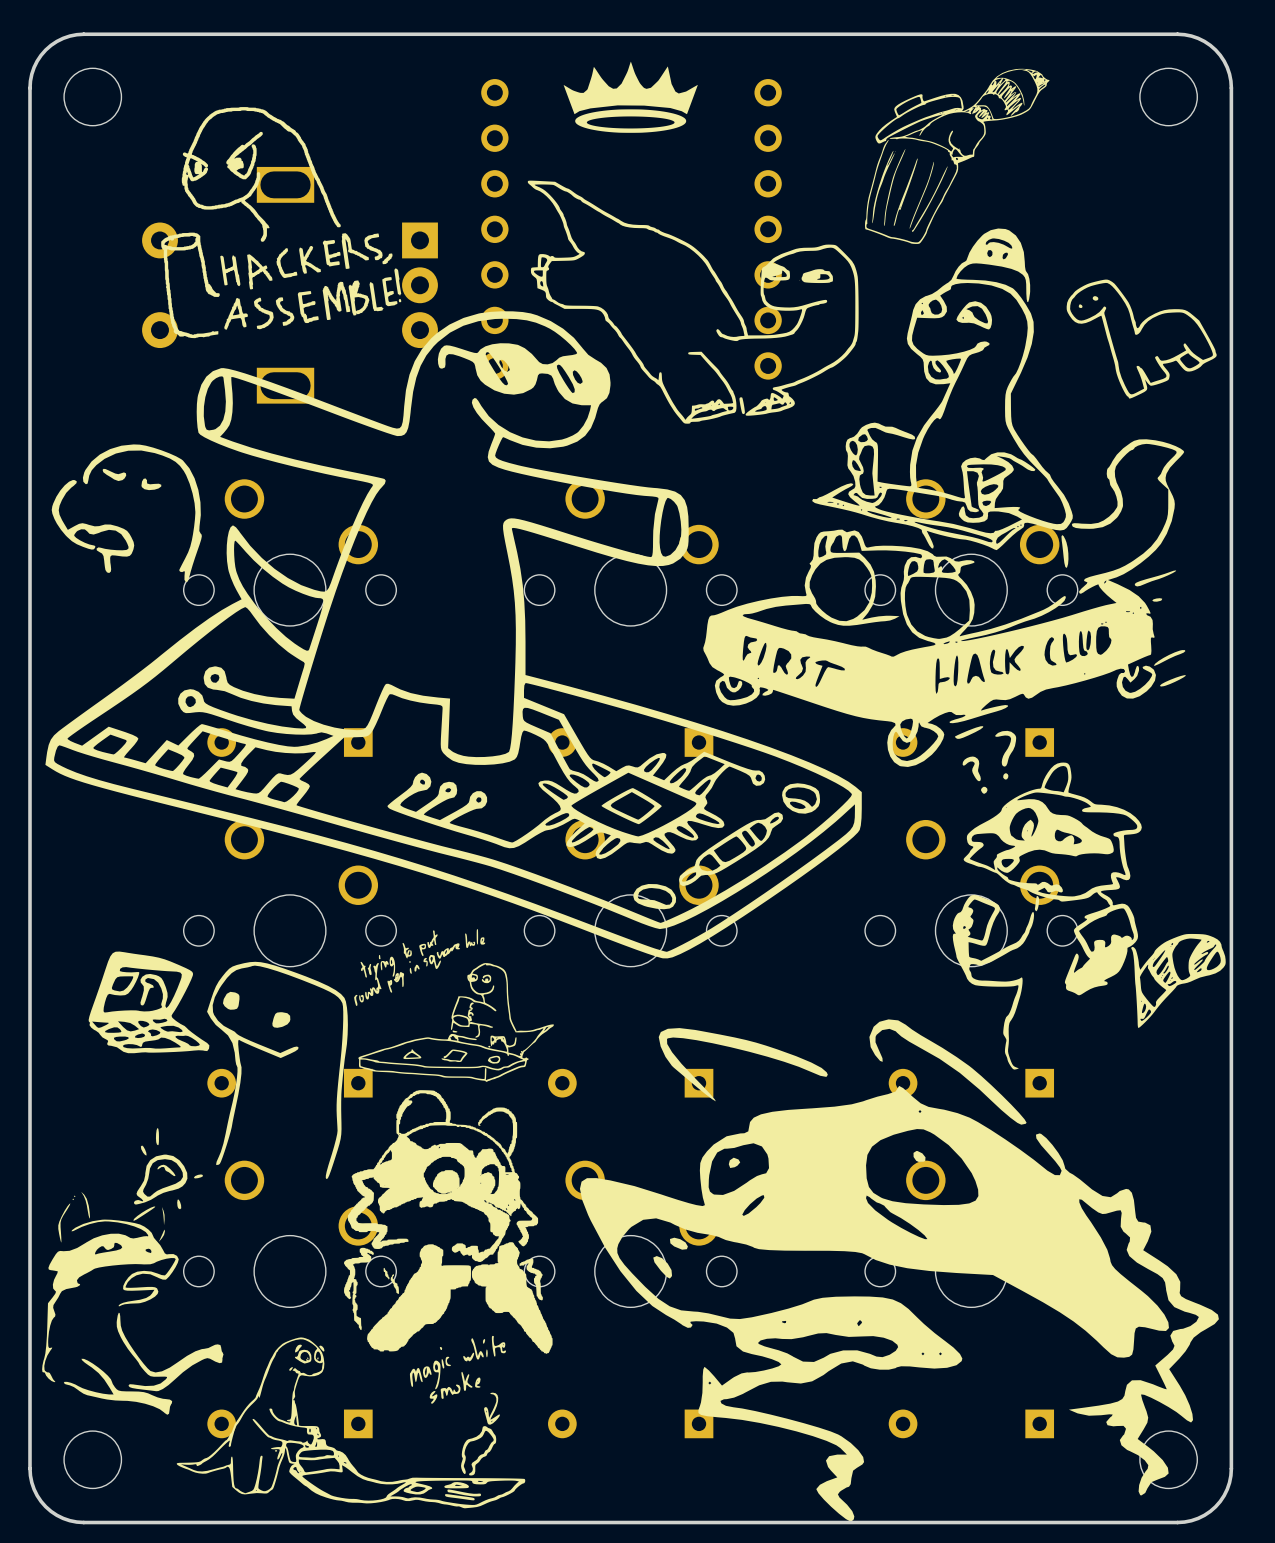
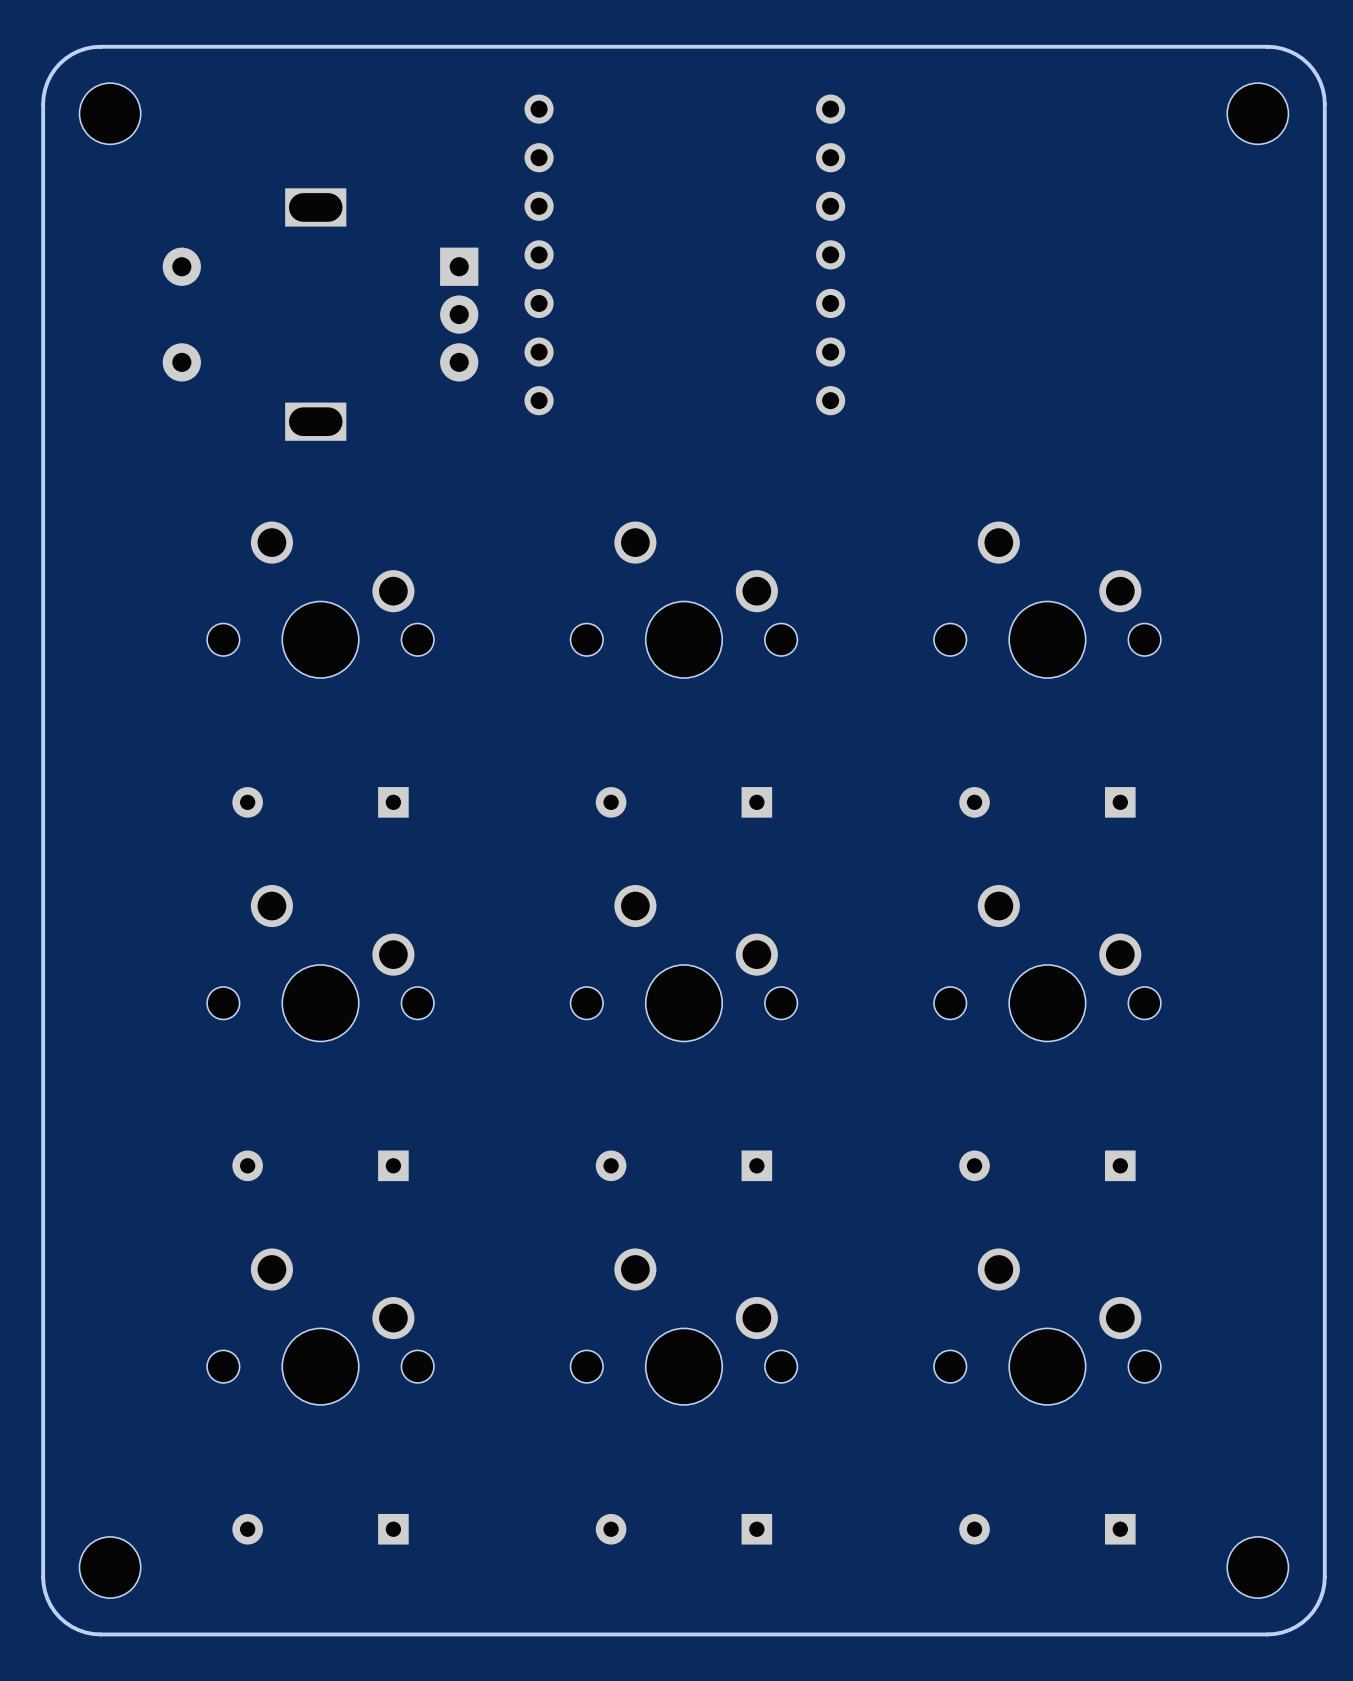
drawing: [563, 61, 698, 133] -> none
drawing: [42, 68, 1226, 1522] -> none

